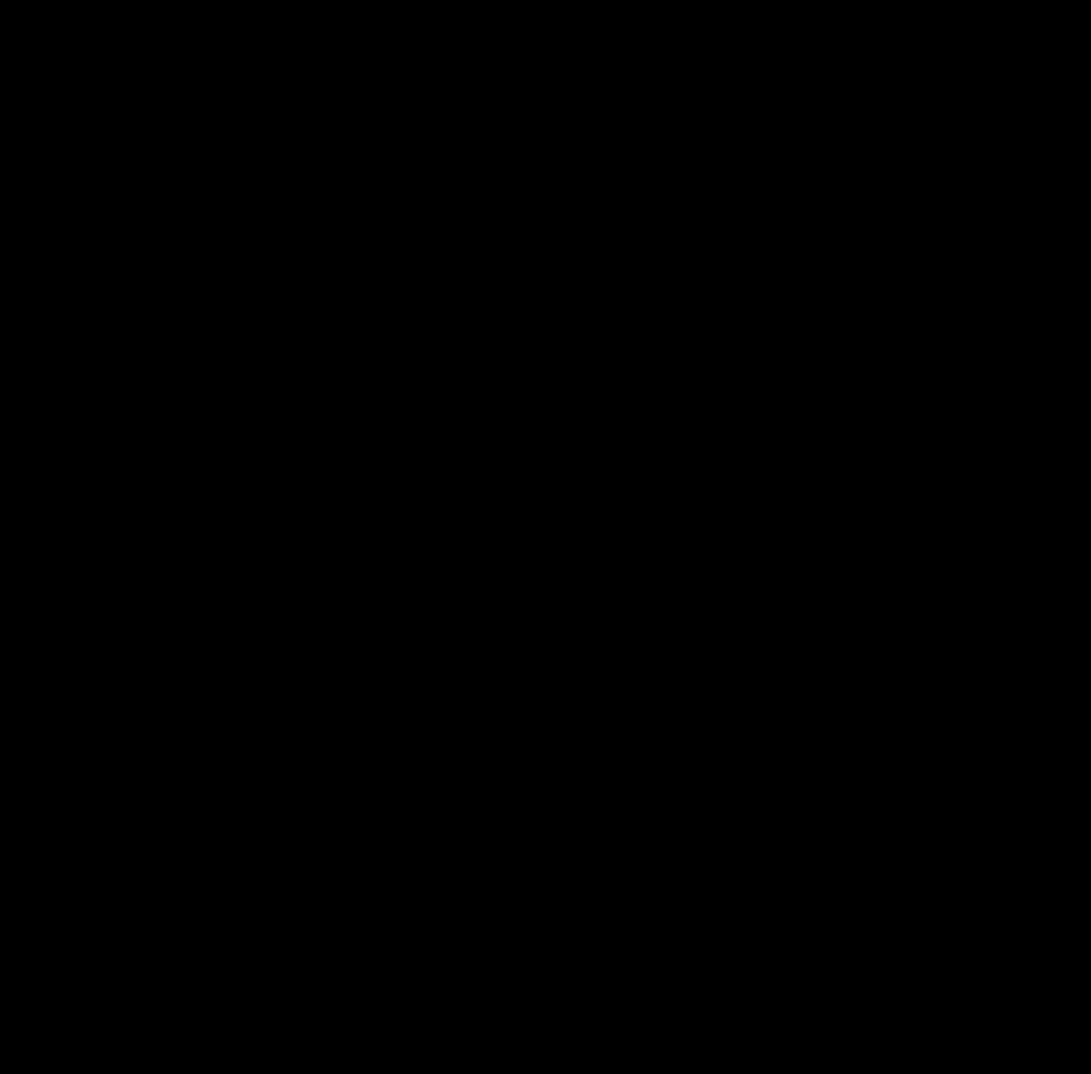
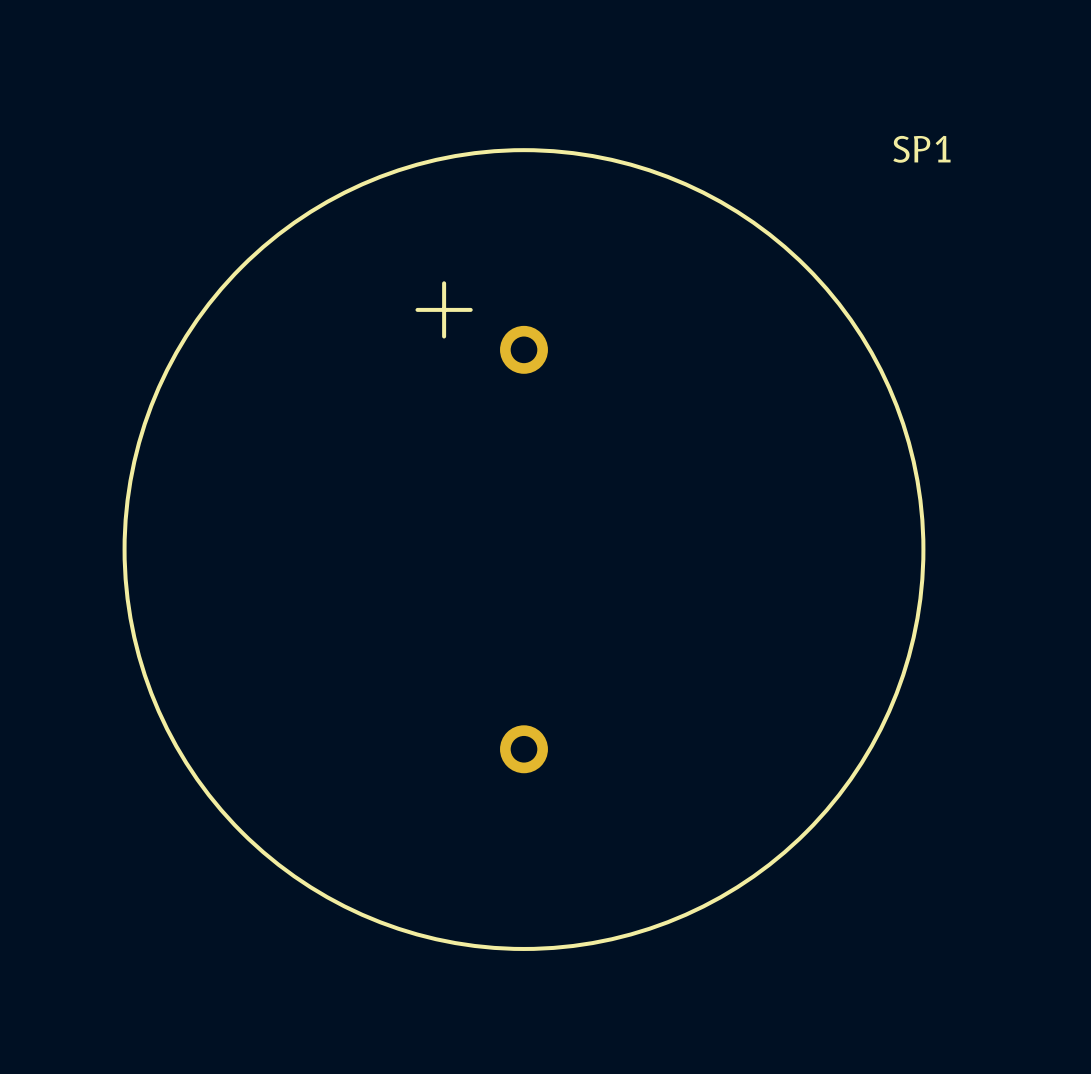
SP1: none -> (523, 549)

